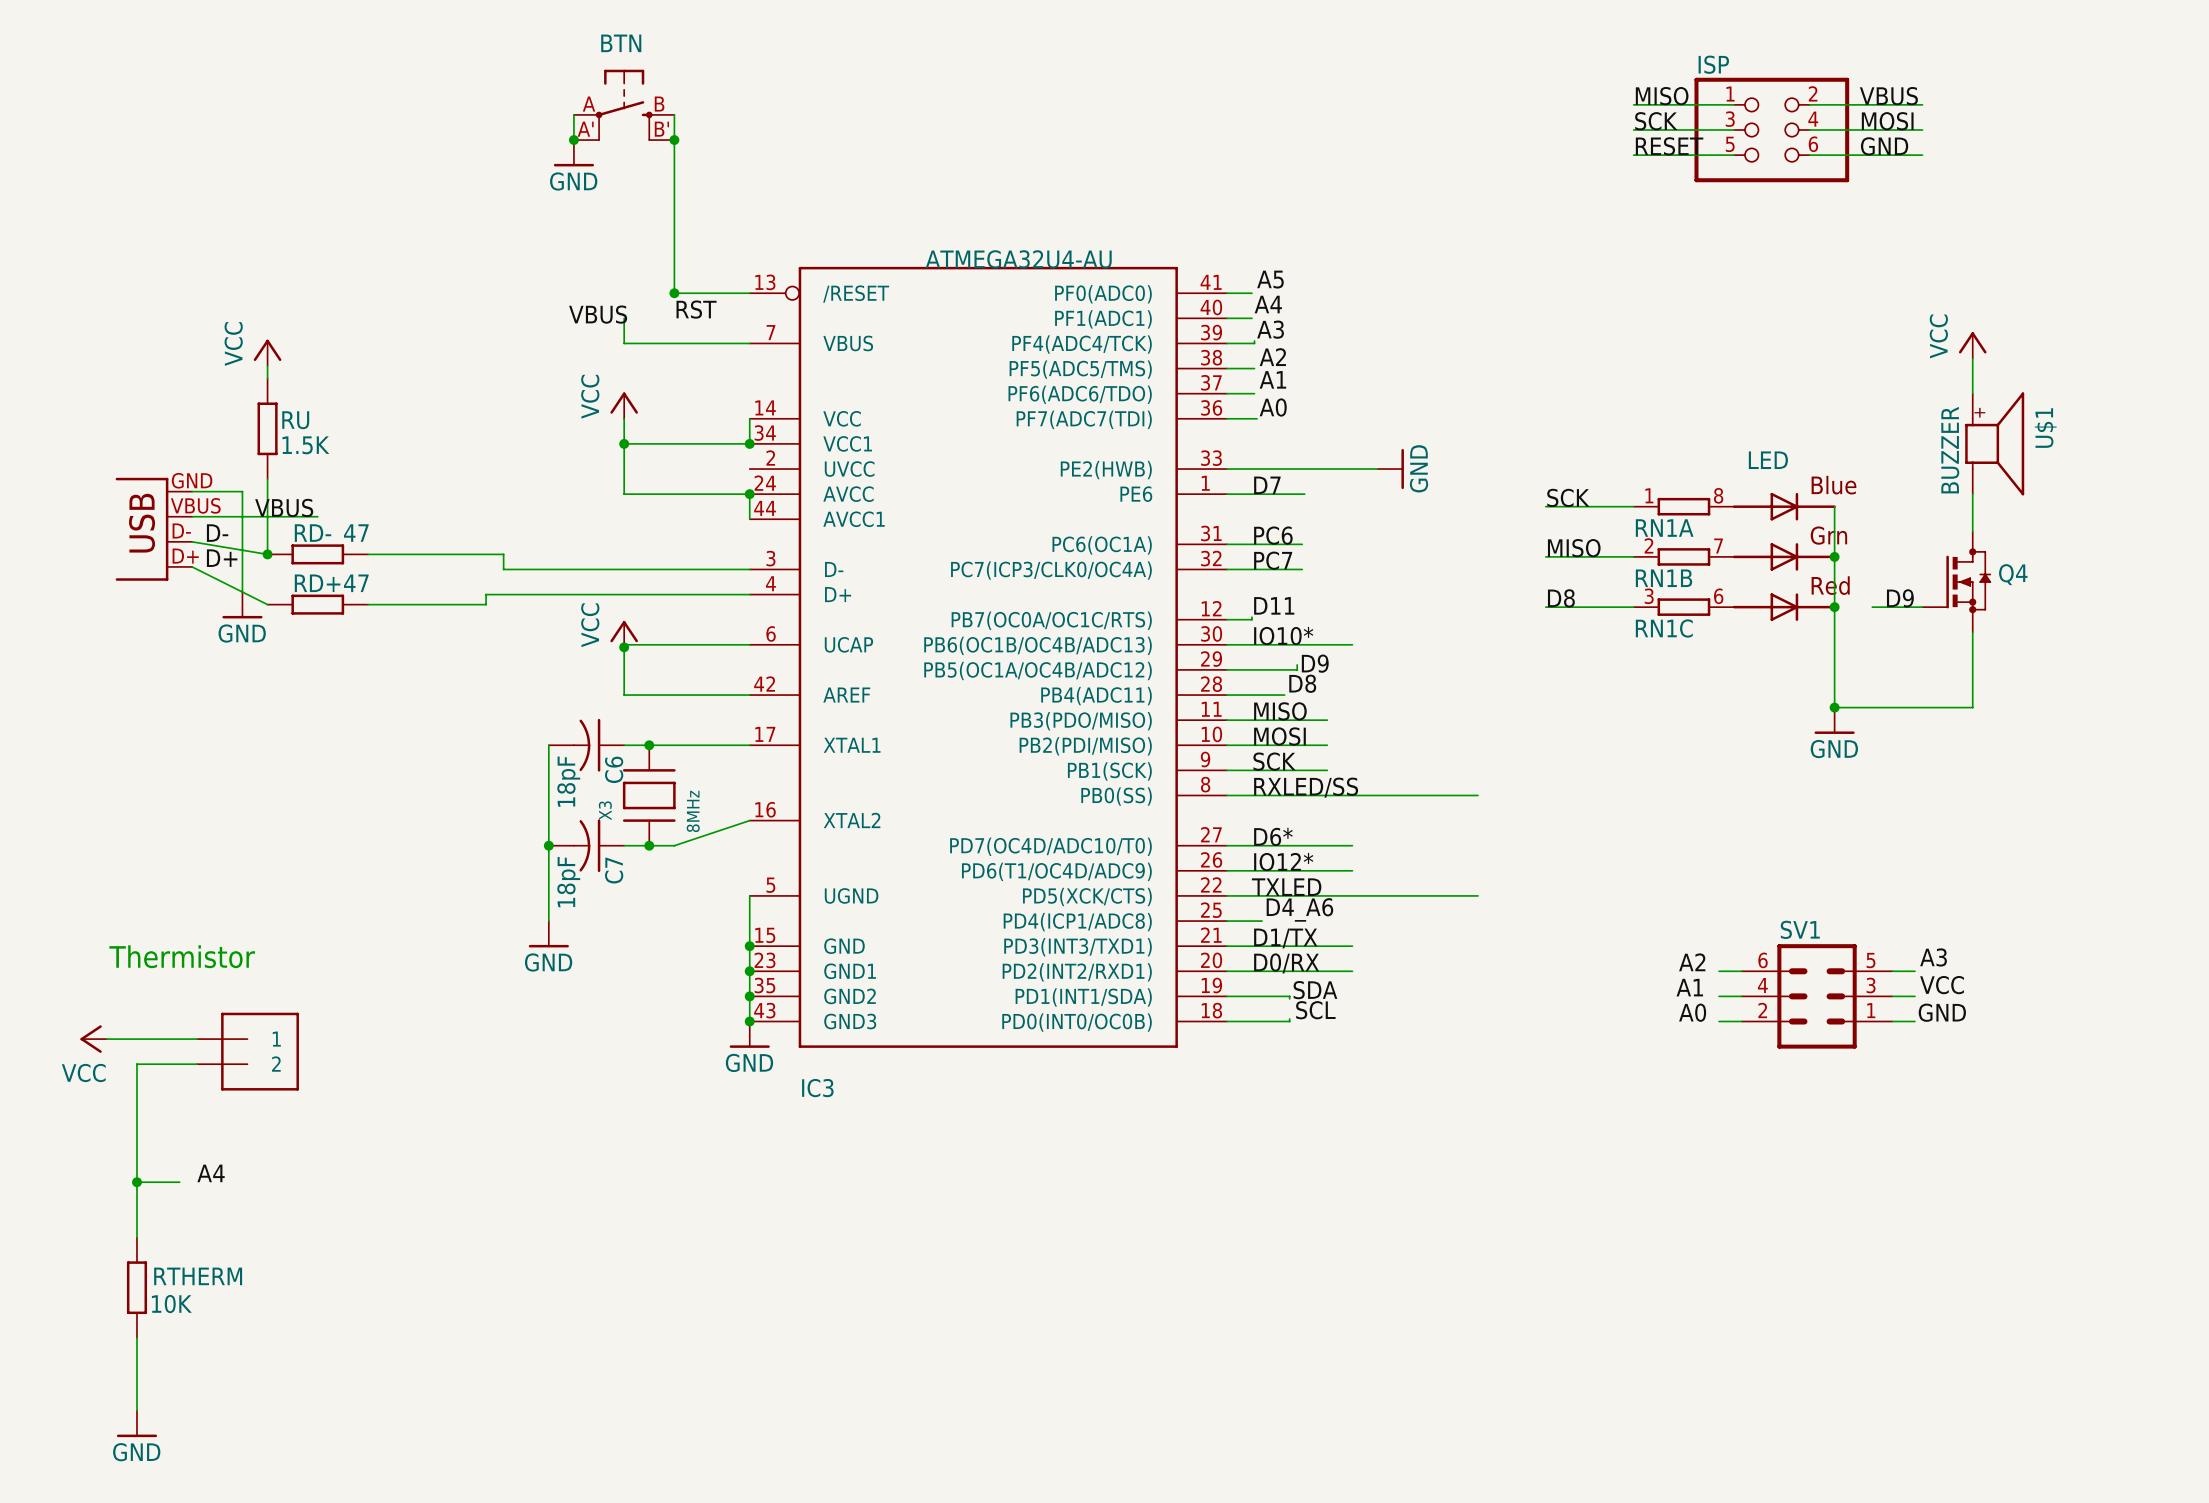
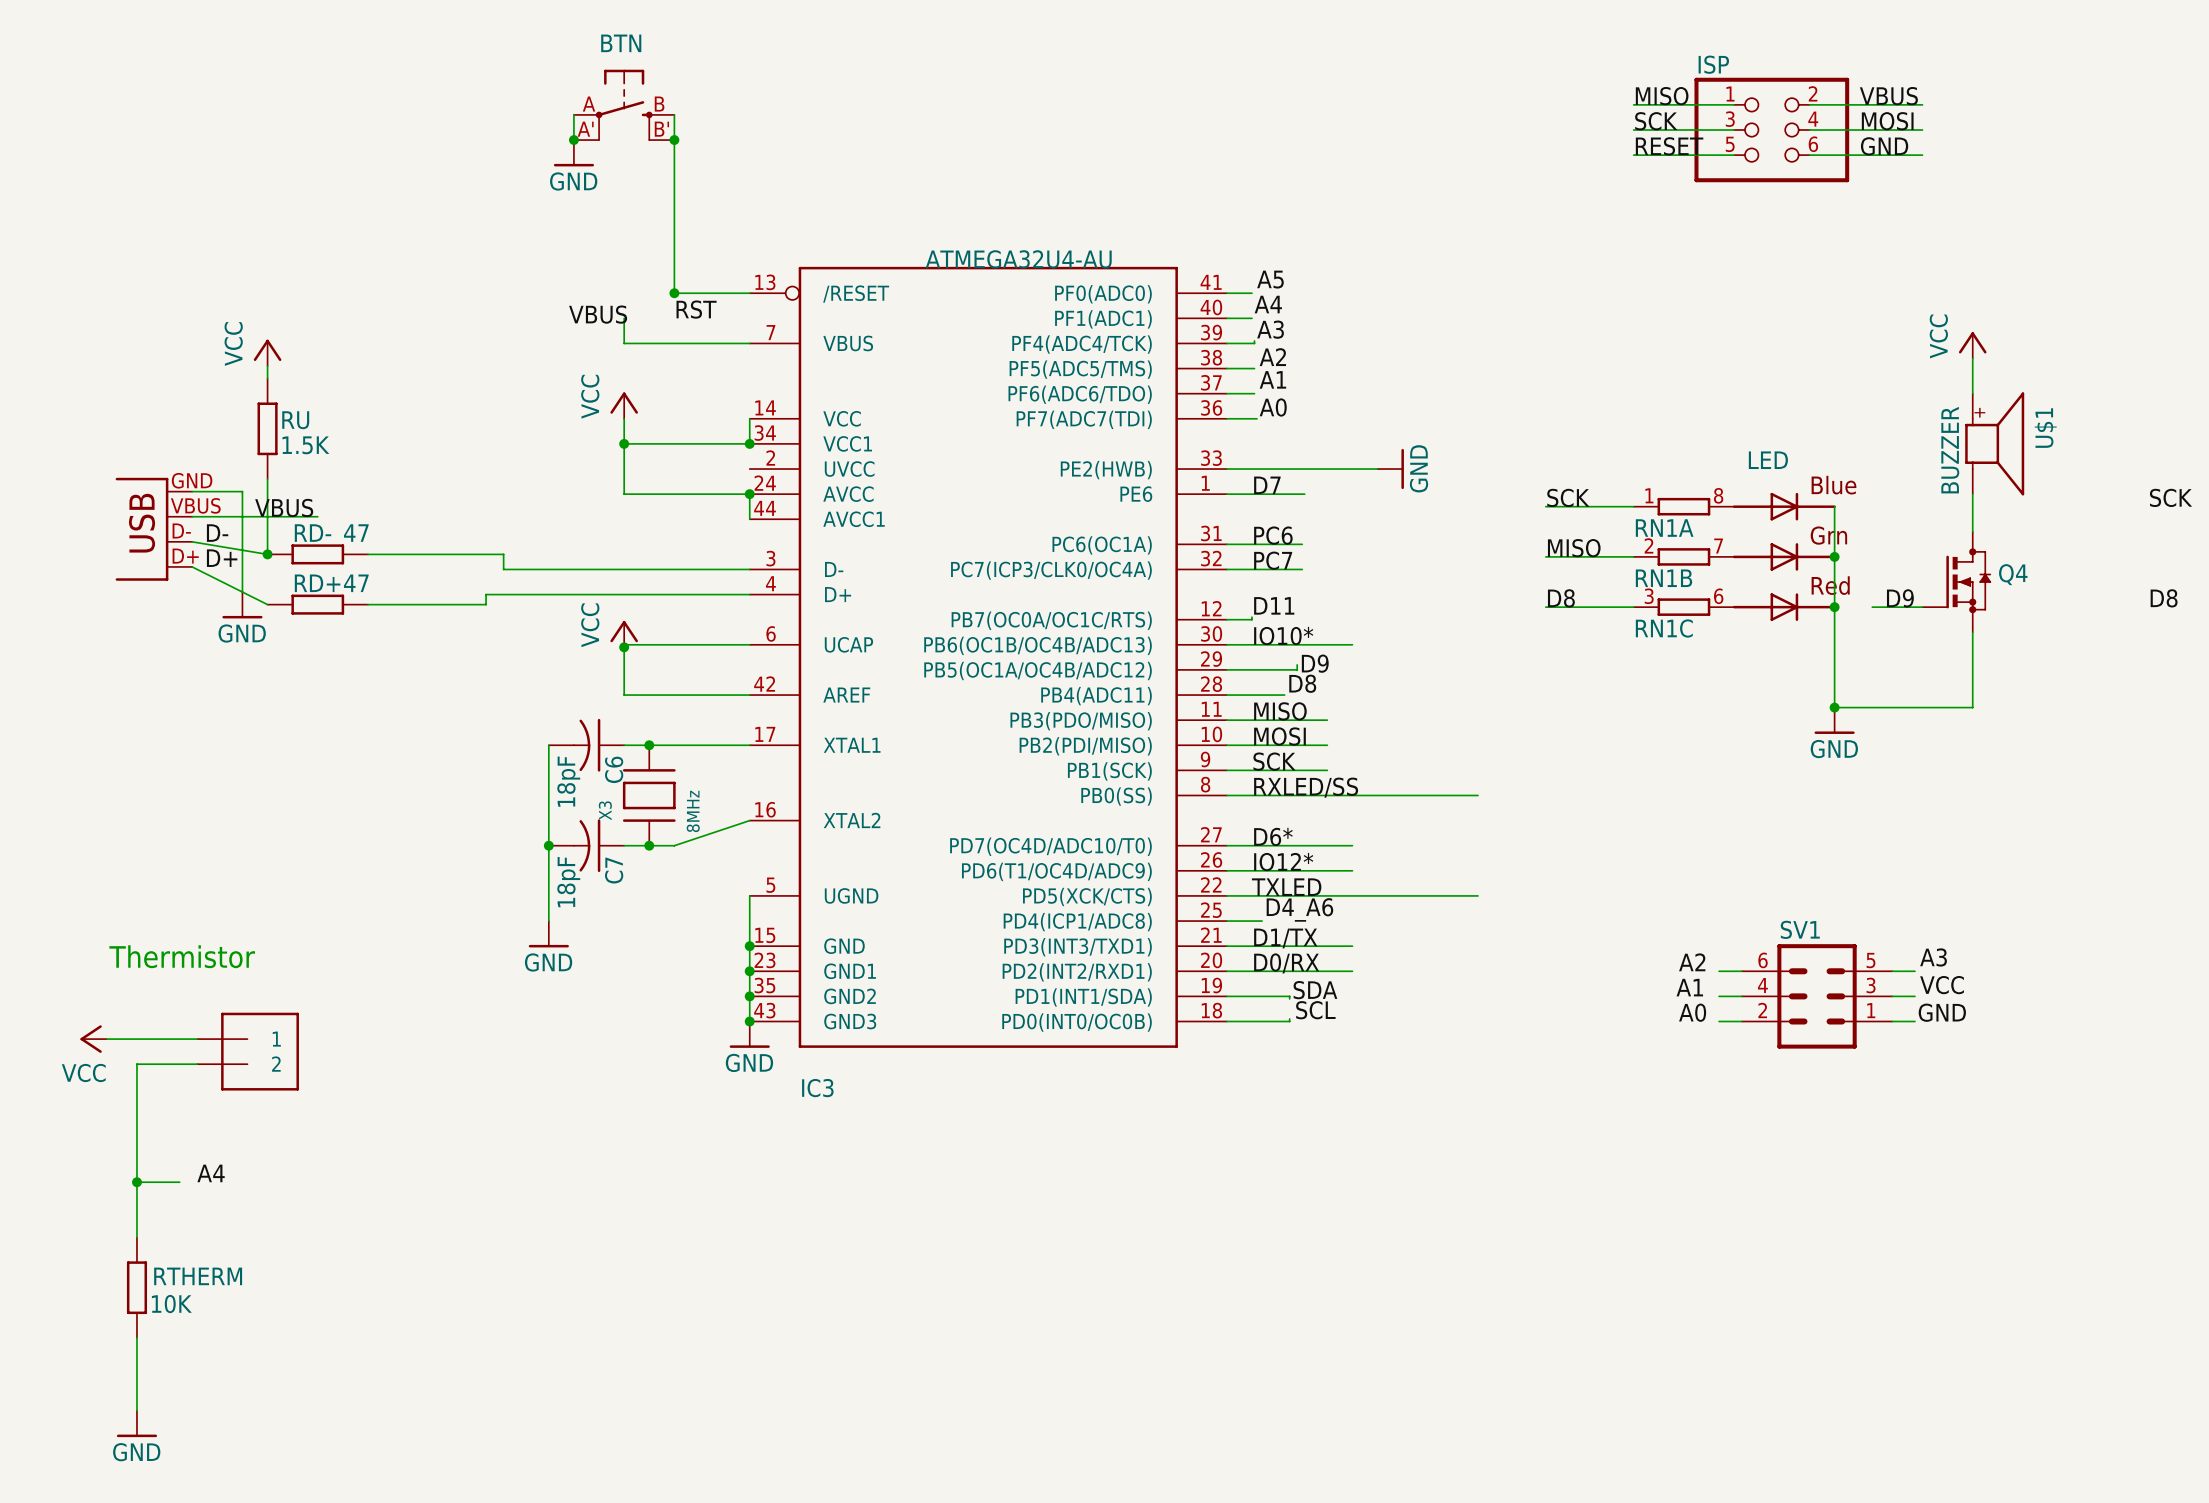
label: none -> SCK (2171, 497)
label: none -> D8 (2164, 598)

